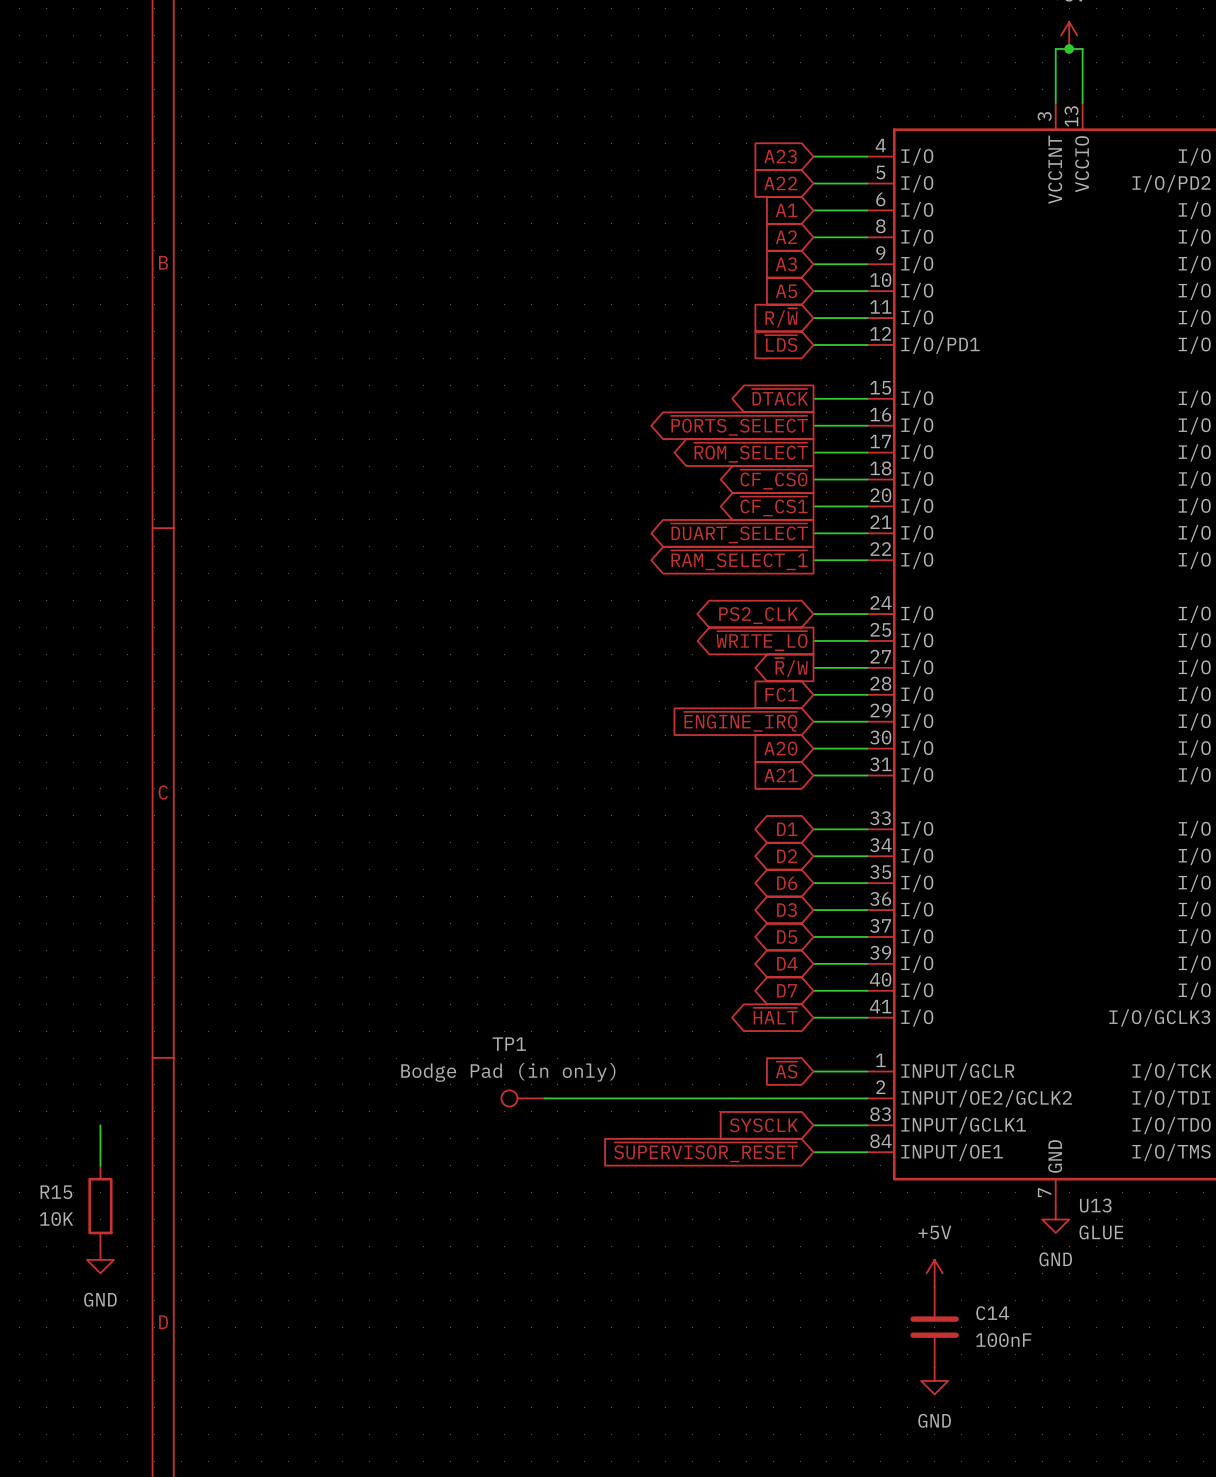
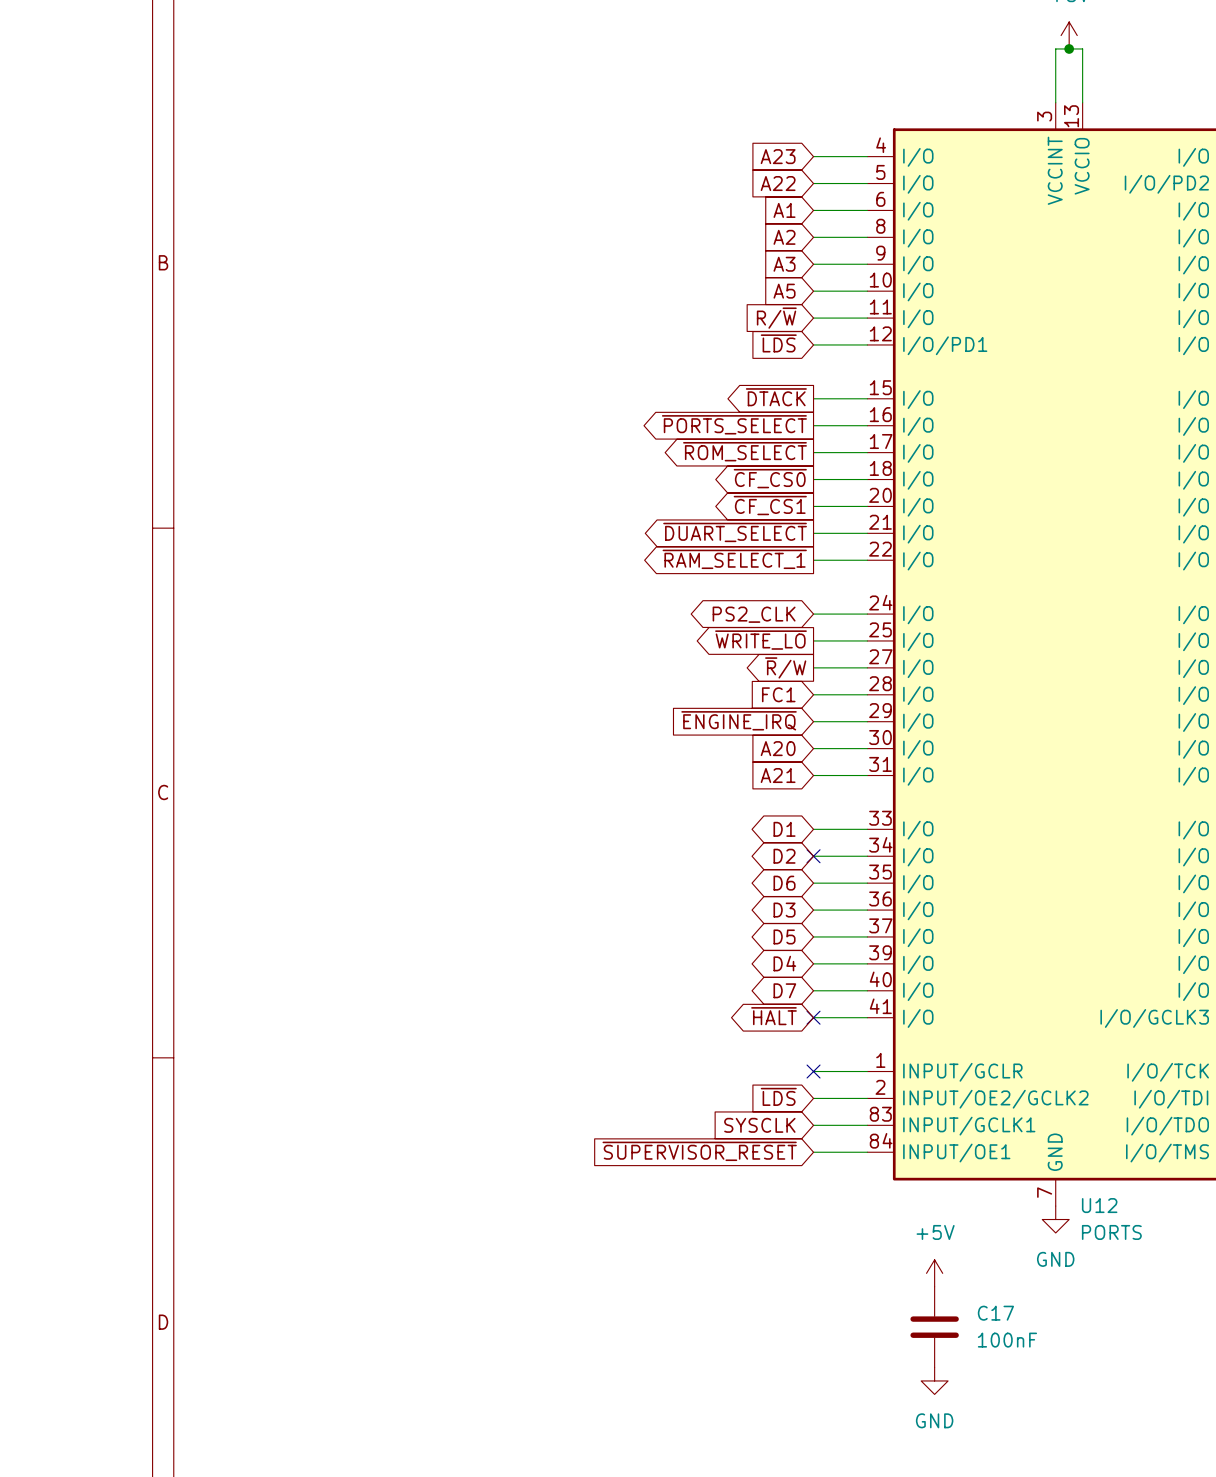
no-connect mark: none -> (813, 856)
no-connect mark: none -> (813, 1017)
global label: ~{AS} (786, 1070) -> ~{LDS} (778, 1096)
no-connect mark: none -> (813, 1071)
TP1: Bodge Pad (in only) (522, 1098) -> none
wire: (544, 1098) (813, 1098) -> none
wire: (100, 1125) (100, 1165) -> none
U13 name: U13 (1095, 1205) -> U12 (1099, 1205)
R15: 10K (100, 1206) -> none
U13 value: GLUE (1101, 1232) -> PORTS (1111, 1232)
power symbol: GND (100, 1259) -> none
C14 name: C14 (992, 1313) -> C17 (995, 1313)

